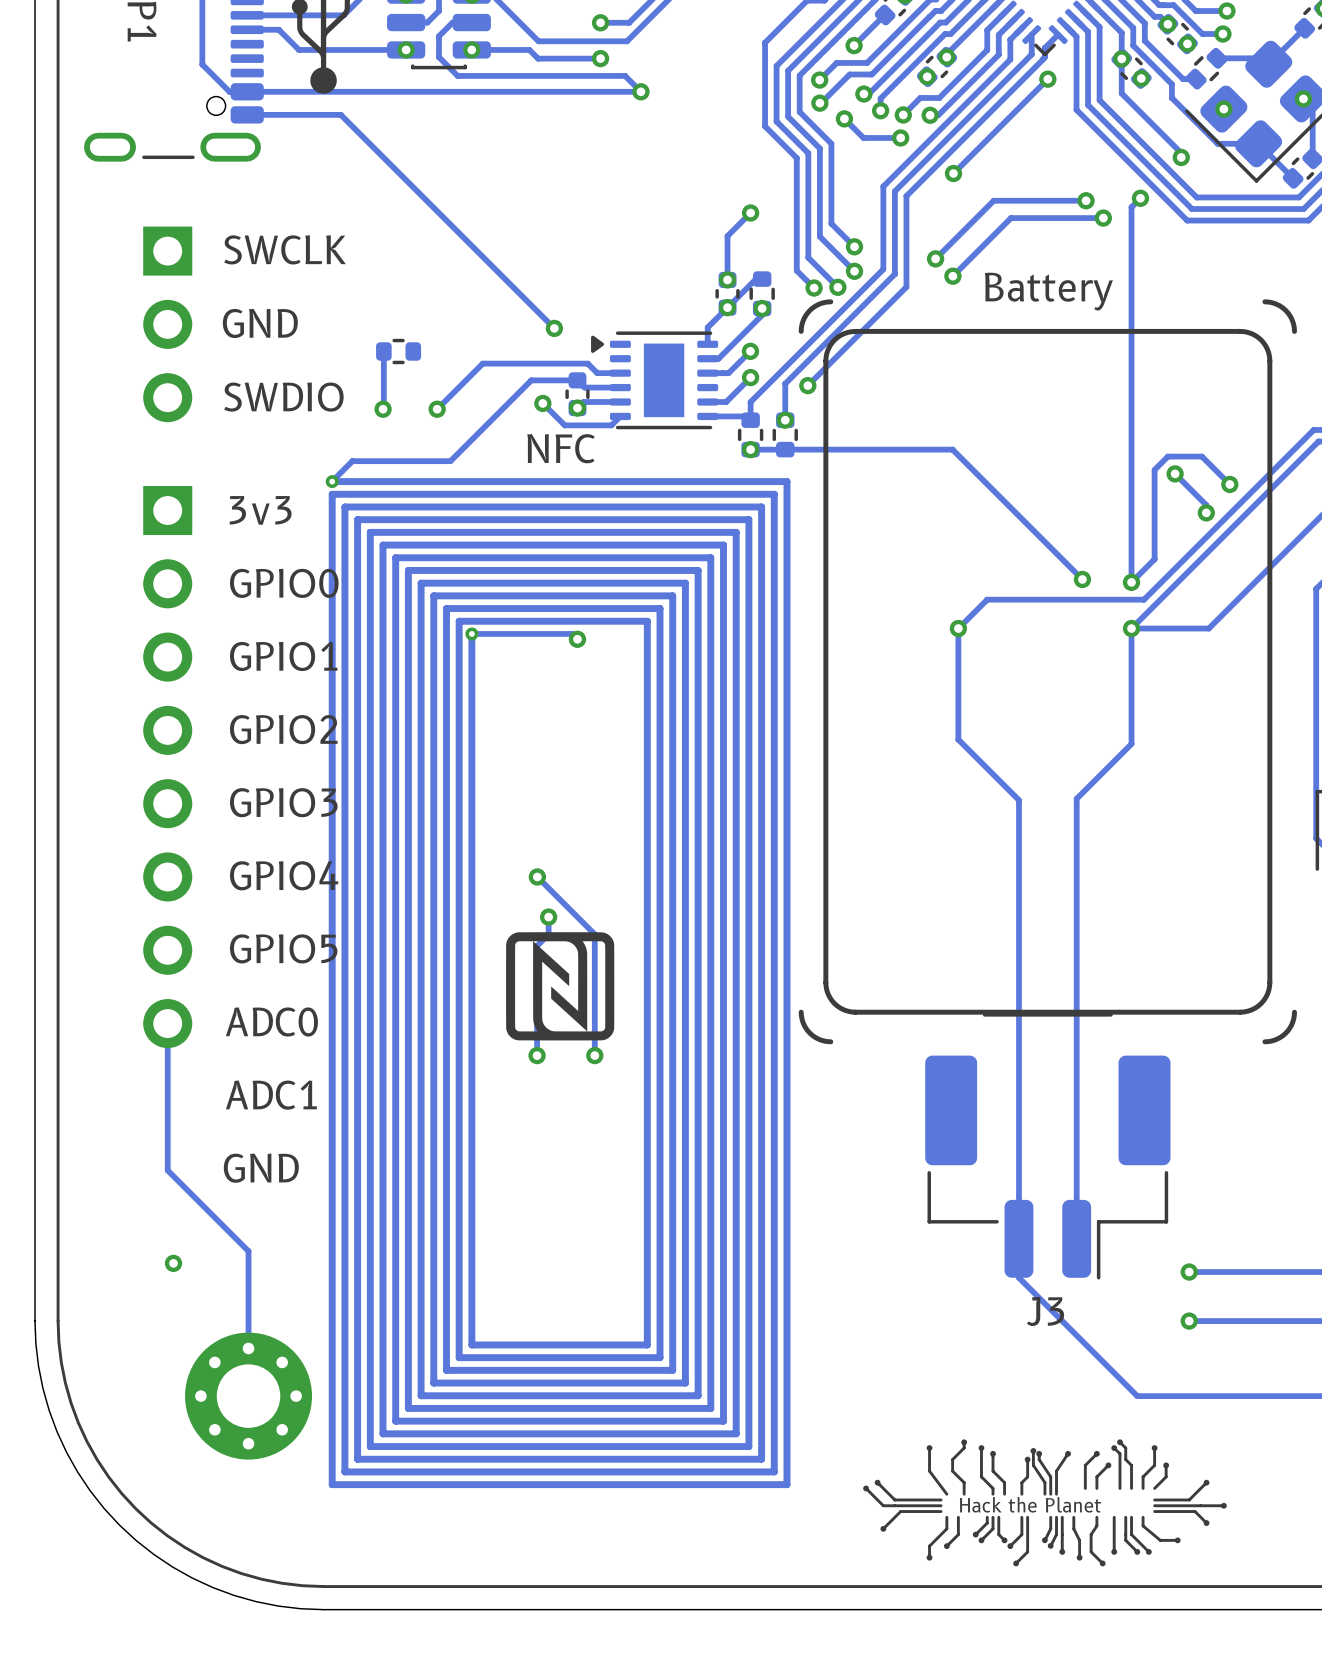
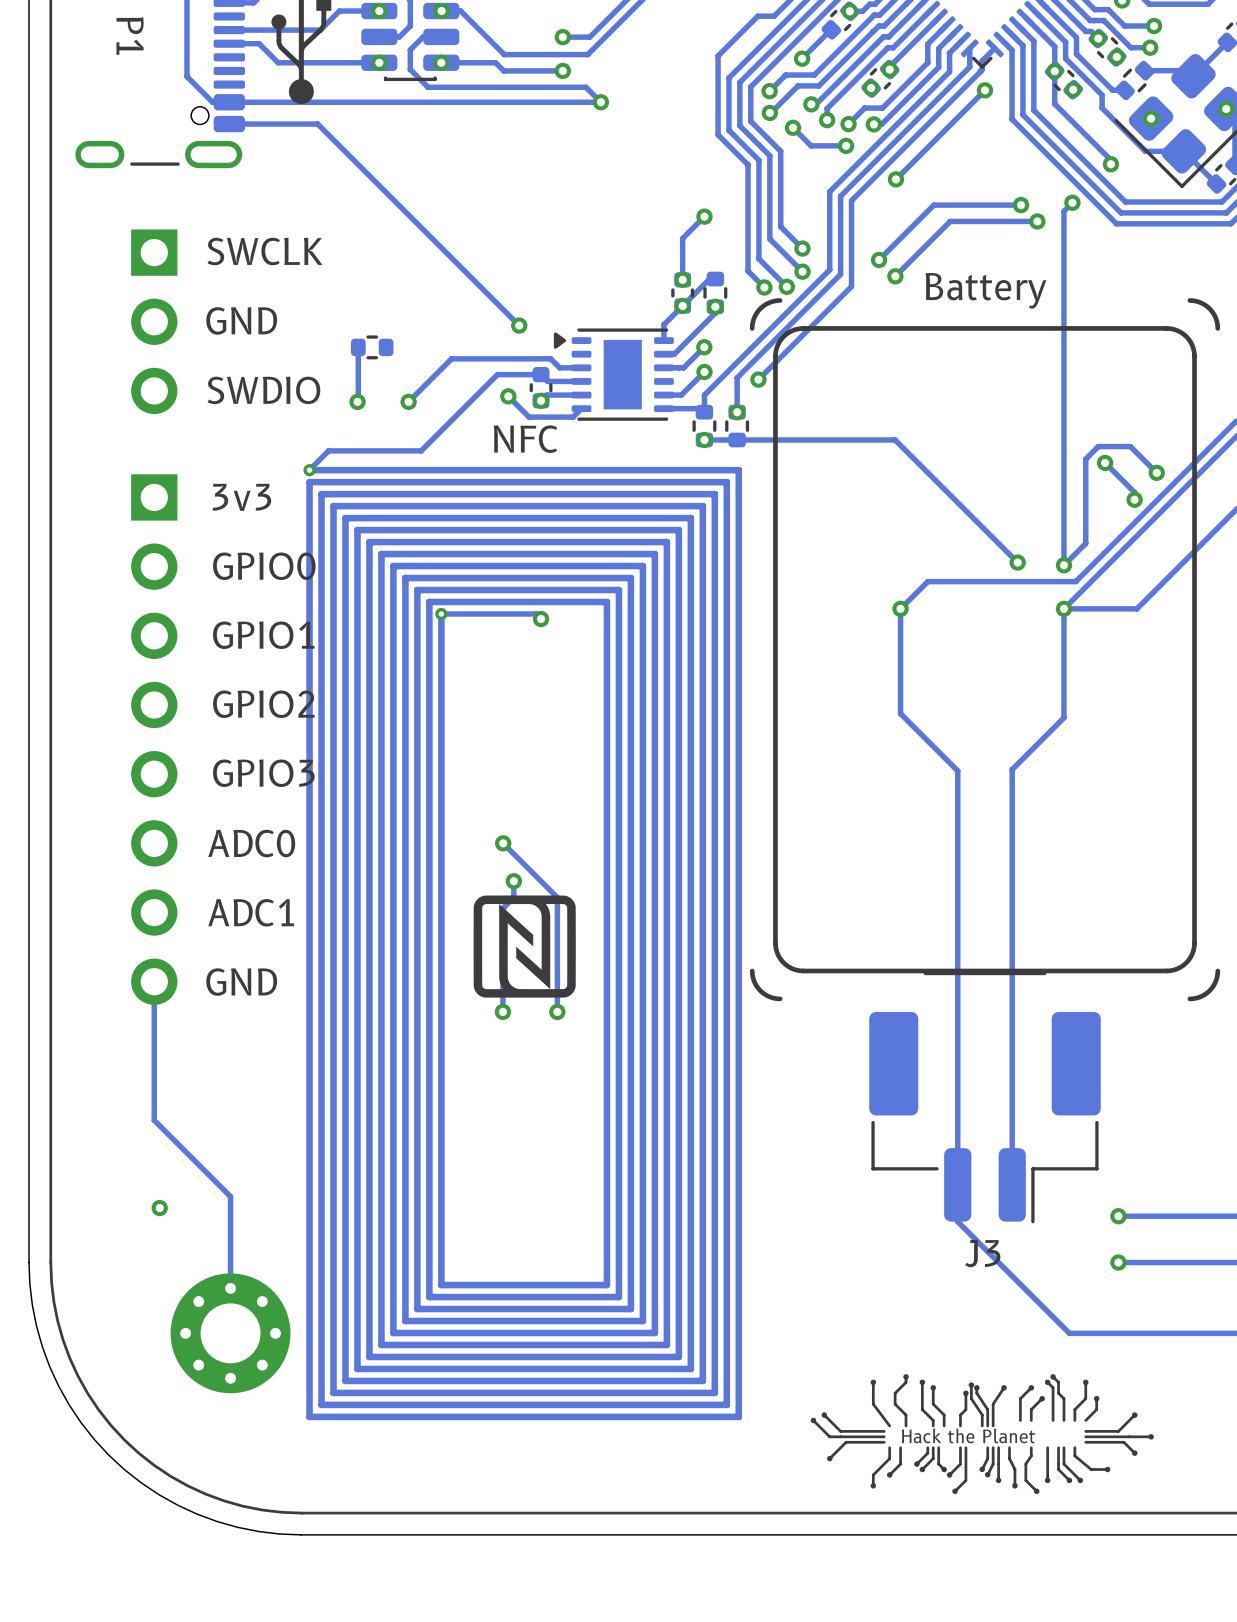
text: GPIO4 (284, 875) -> ADC0 (251, 843)
text: GPIO5 (283, 948) -> ADC1 (251, 912)
text: ADC0 (271, 1021) -> GND (241, 982)
text: ADC1 (271, 1095) -> none
text: GND (261, 1168) -> none

